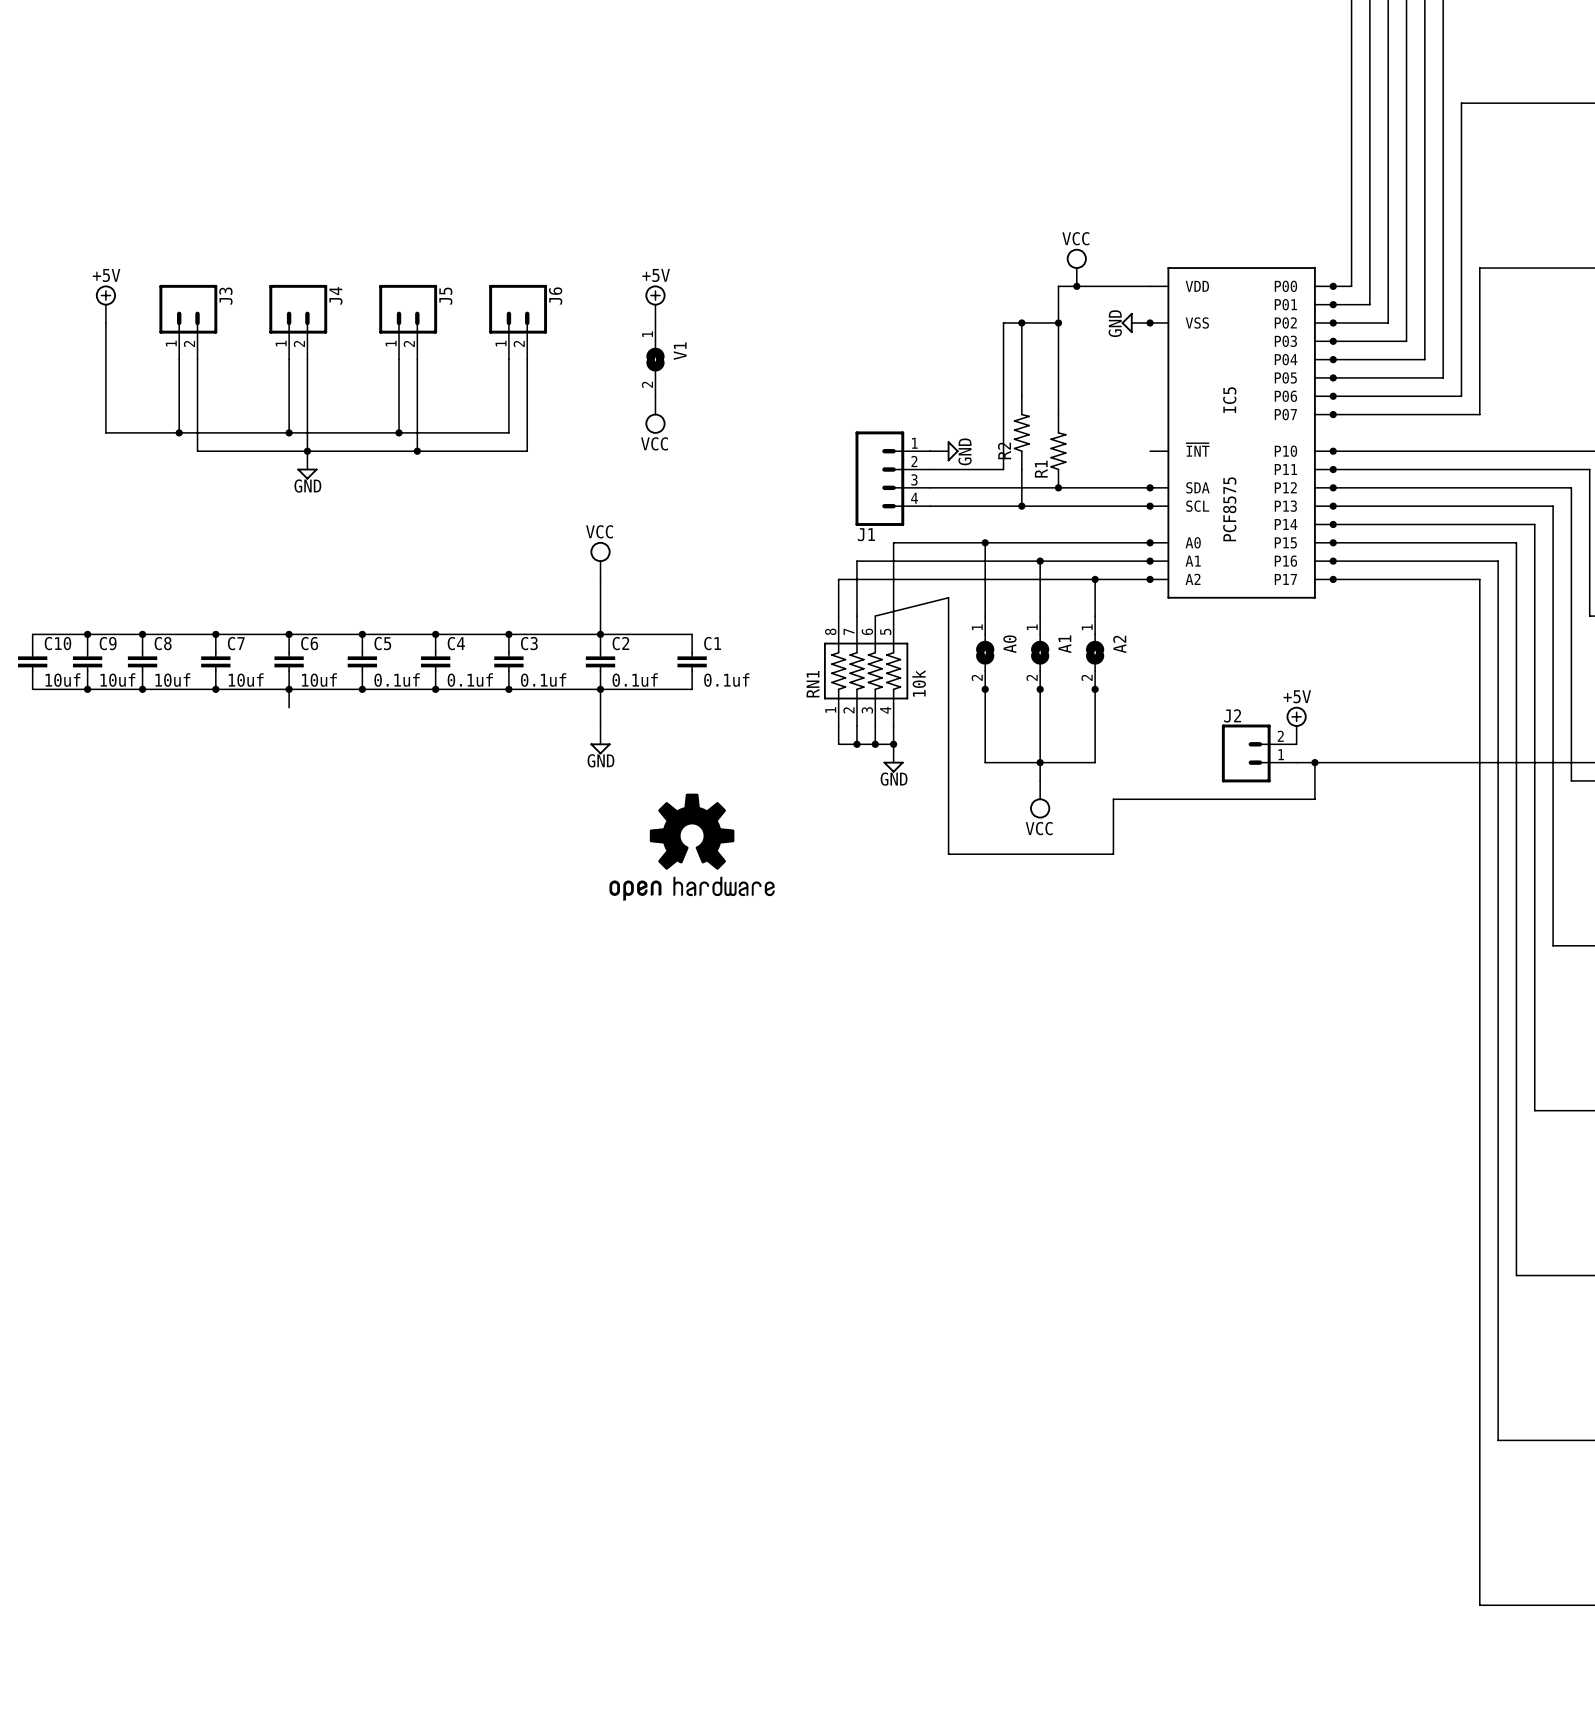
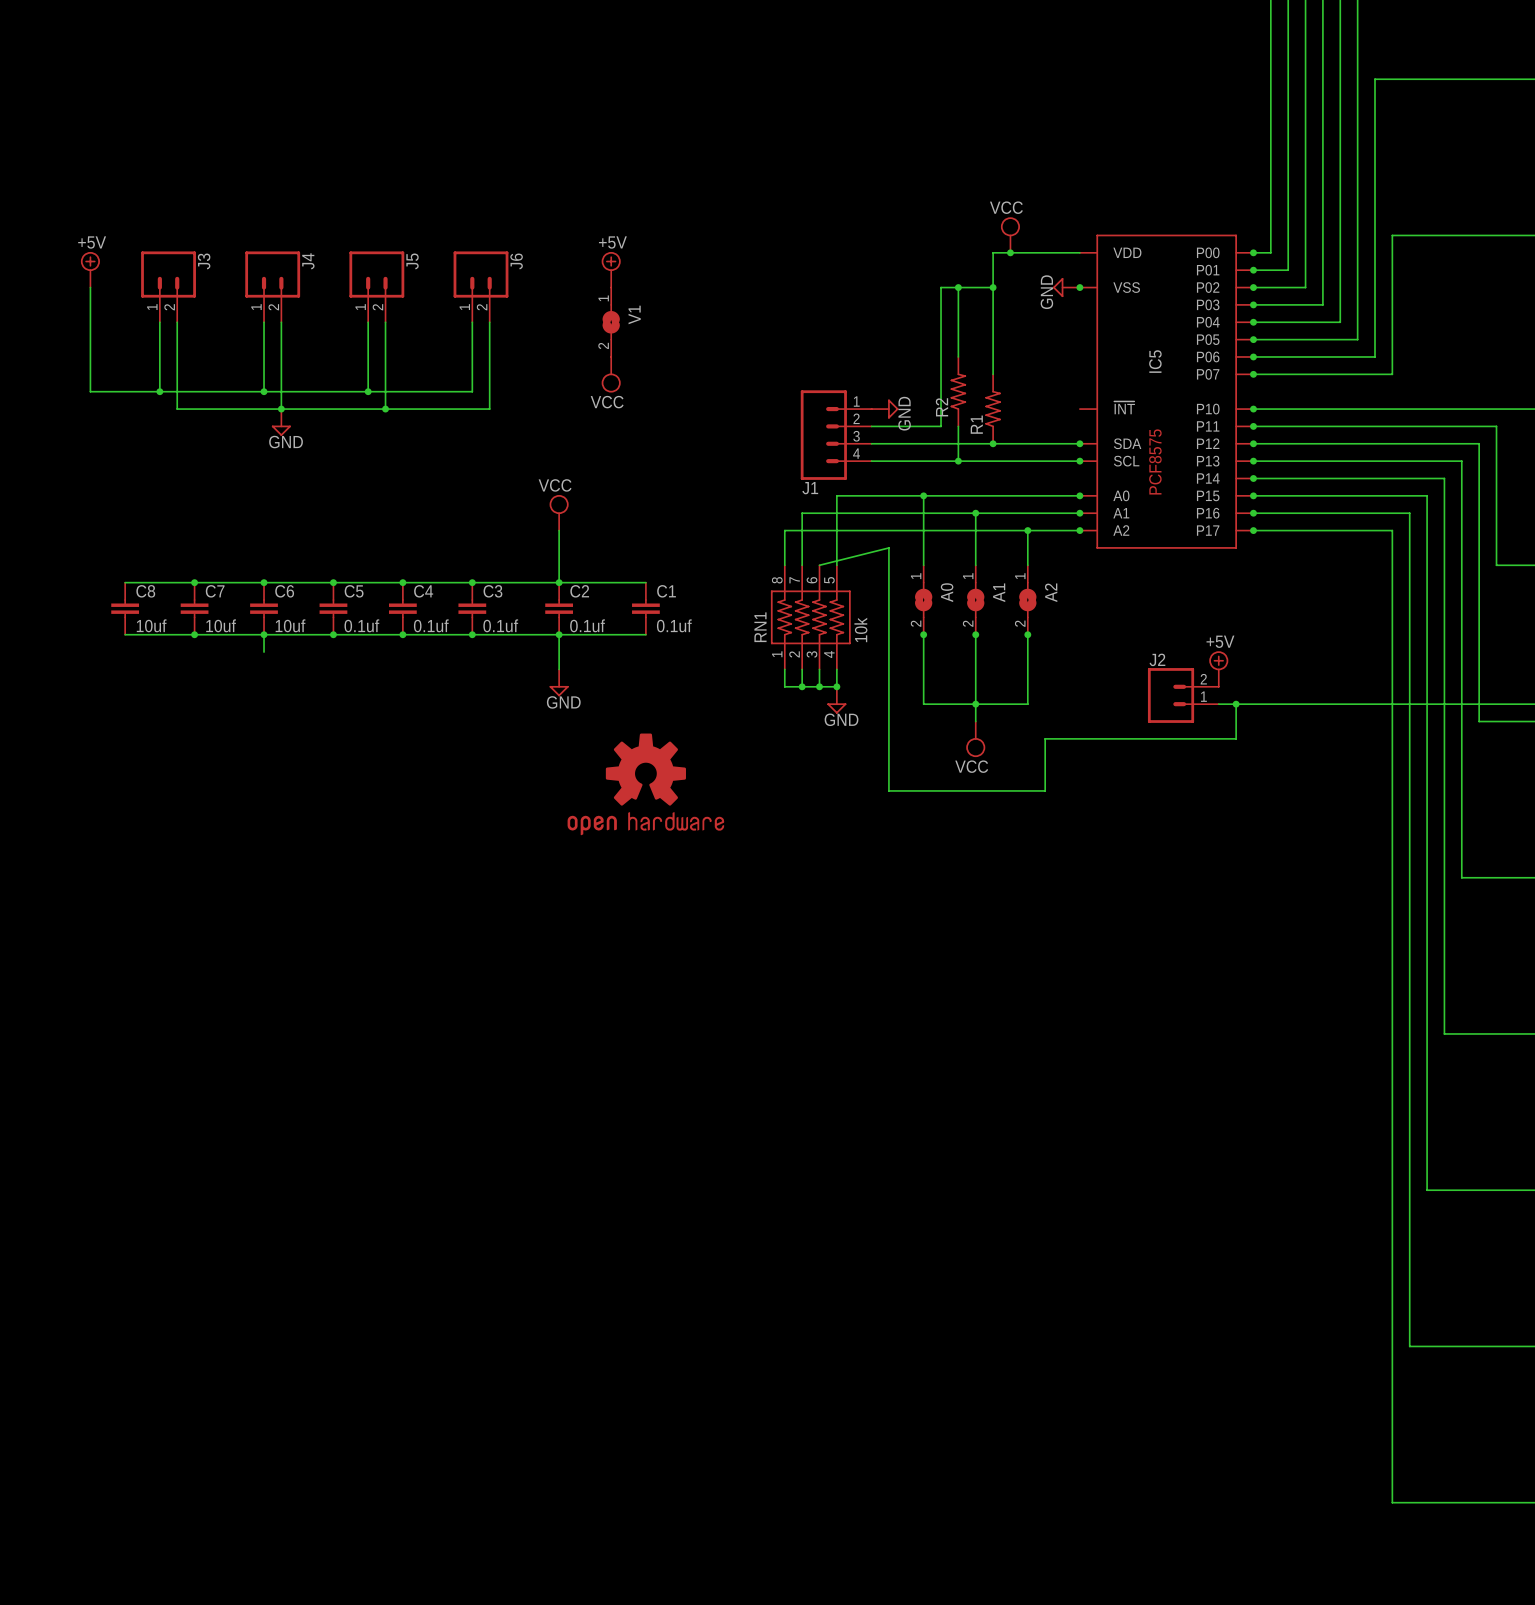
wire: (32, 634) (142, 634) -> none
junction: (87, 634) -> none
junction: (142, 634) -> none
C10: 10uf (32, 661) -> none
C9: 10uf (87, 661) -> none
wire: (32, 689) (142, 689) -> none
junction: (87, 689) -> none
junction: (142, 689) -> none

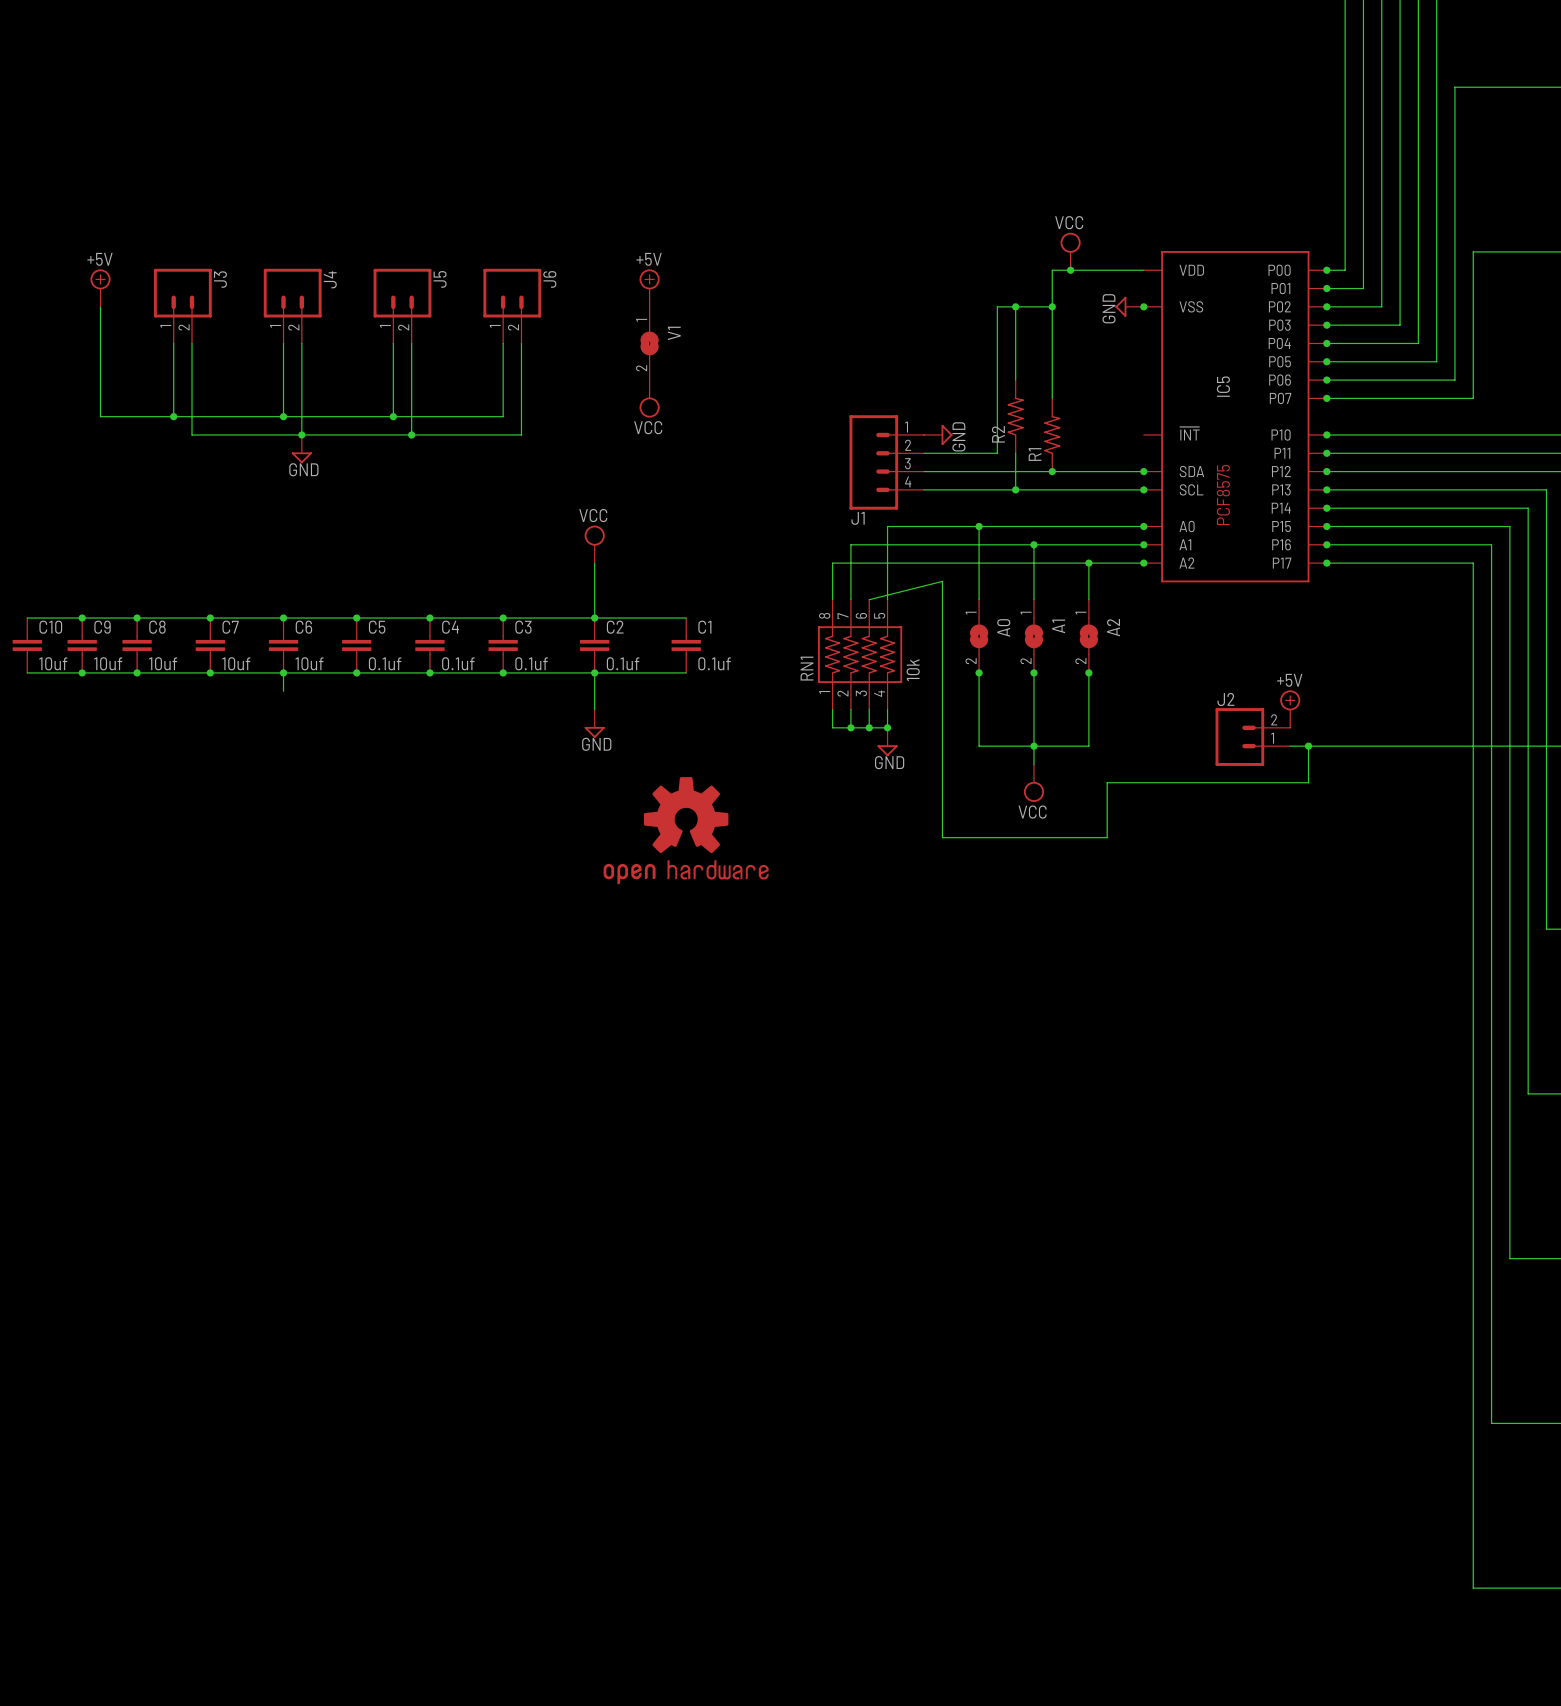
wire: none -> (27, 618) (137, 618)
junction: none -> (82, 618)
junction: none -> (137, 618)
C10: none -> 10uf (27, 645)
C9: none -> 10uf (82, 645)
wire: none -> (27, 672) (137, 672)
junction: none -> (82, 672)
junction: none -> (137, 672)

